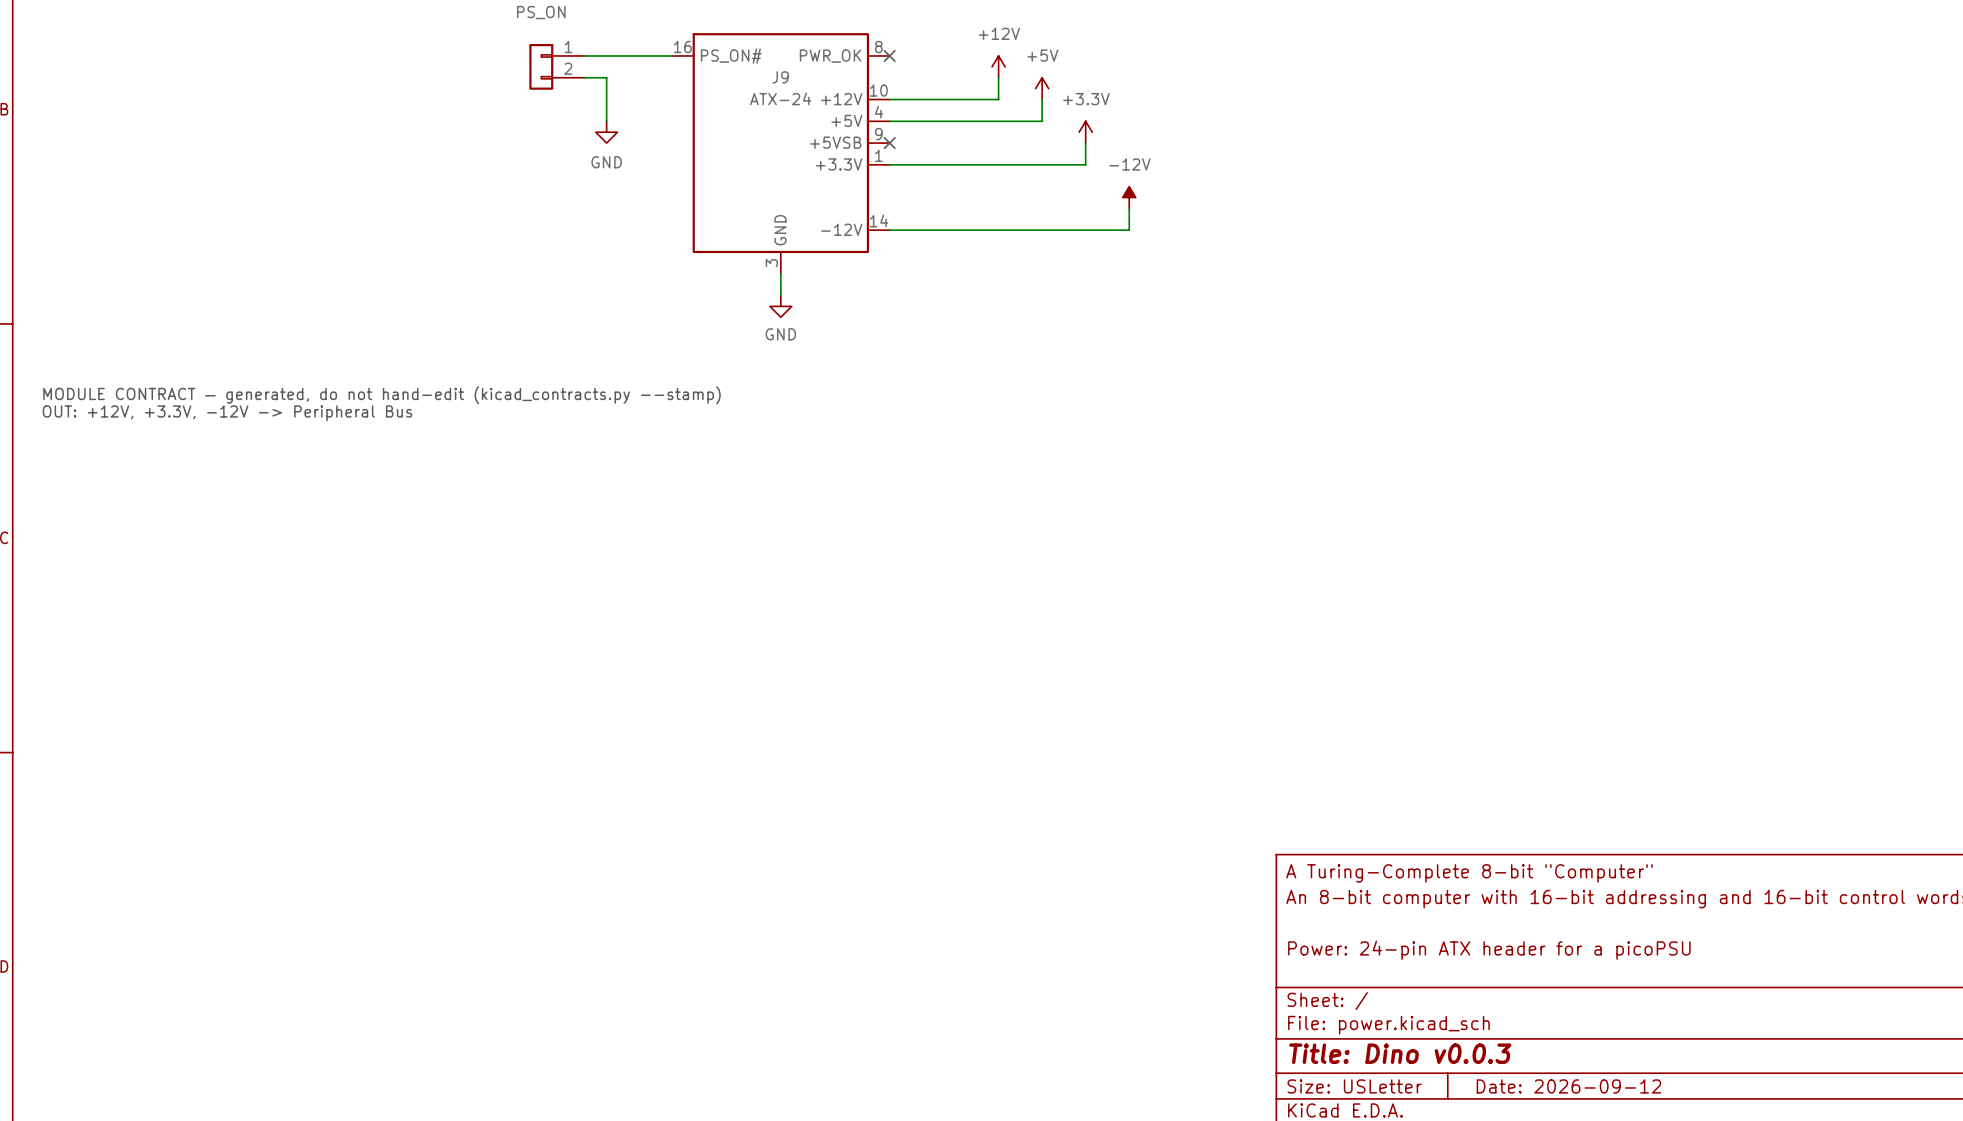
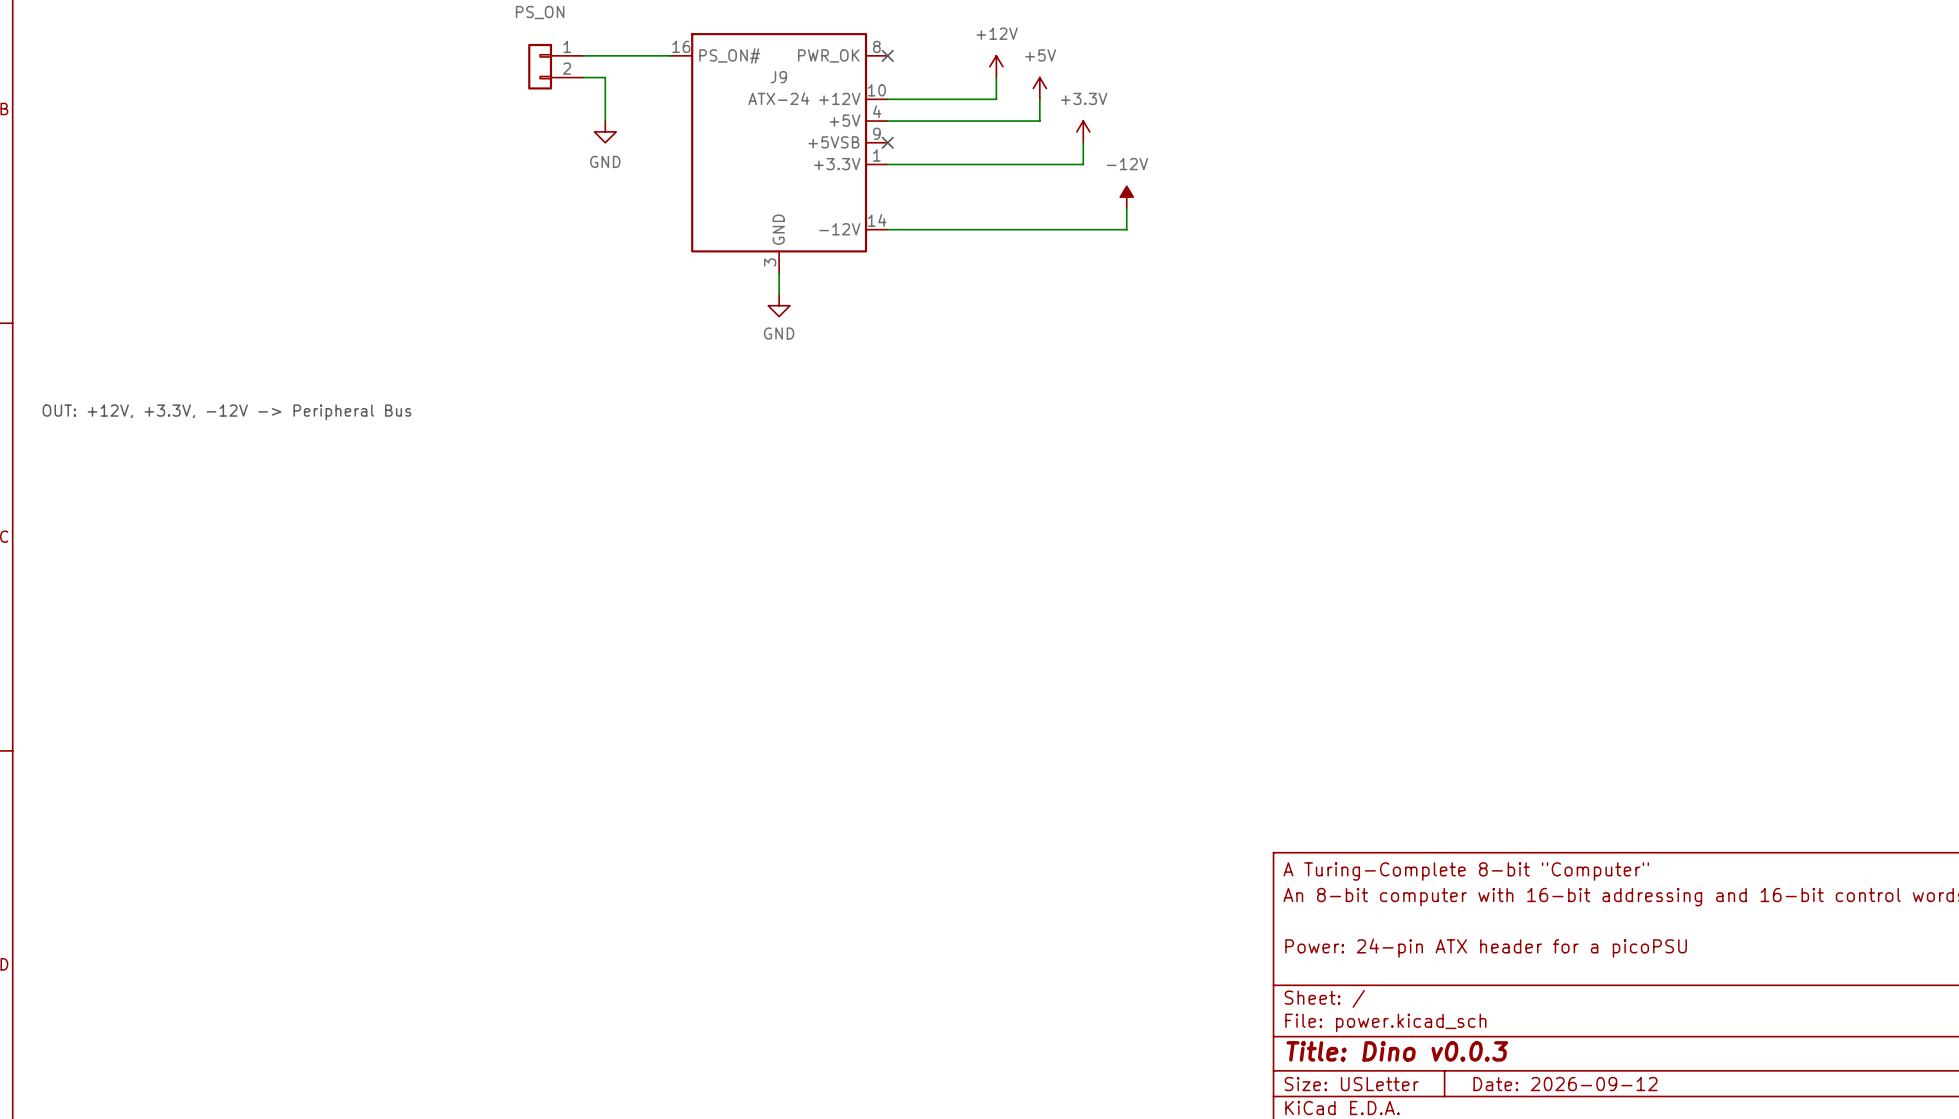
text: MODULE CONTRACT — generated, do not hand-edit (kicad_contracts.py --stamp) (381, 395) -> none

